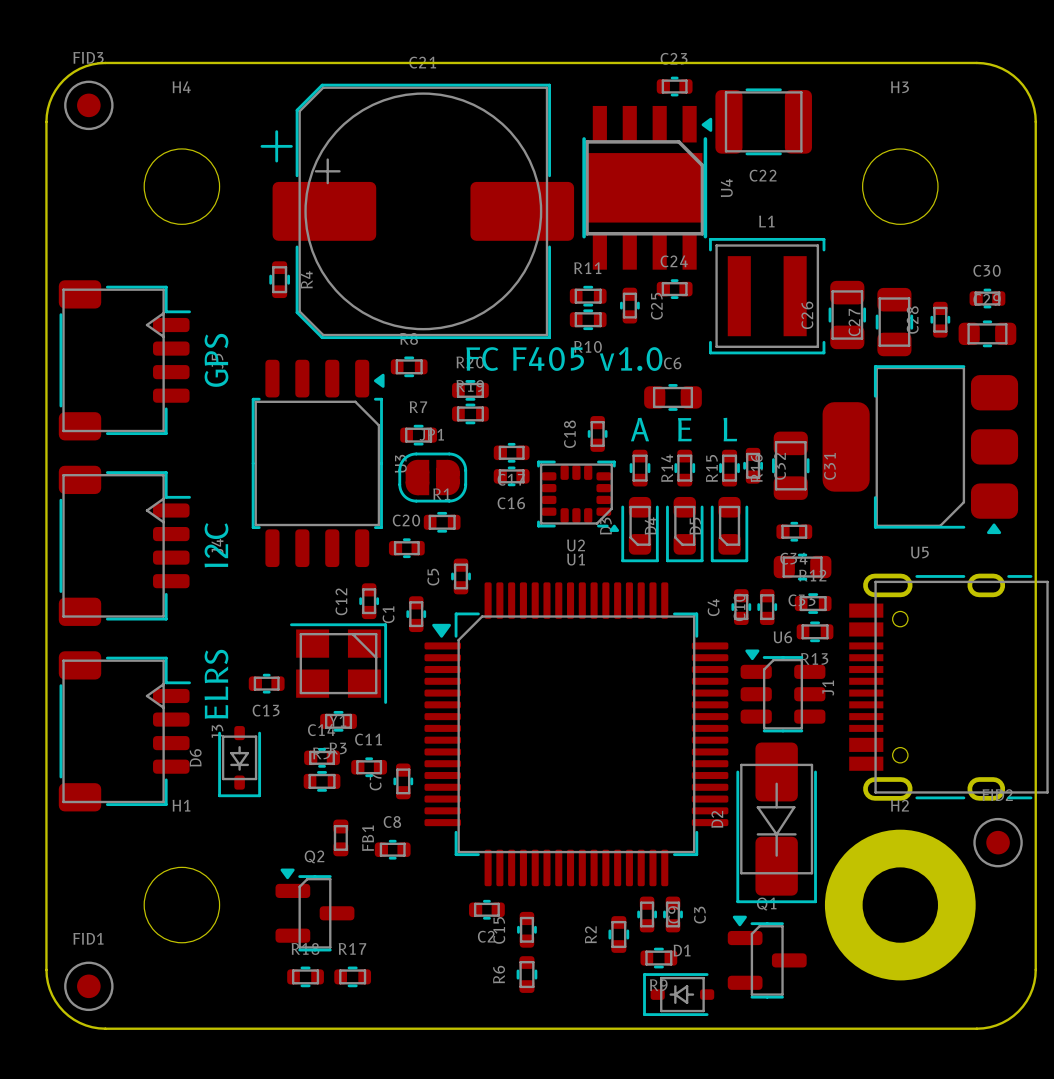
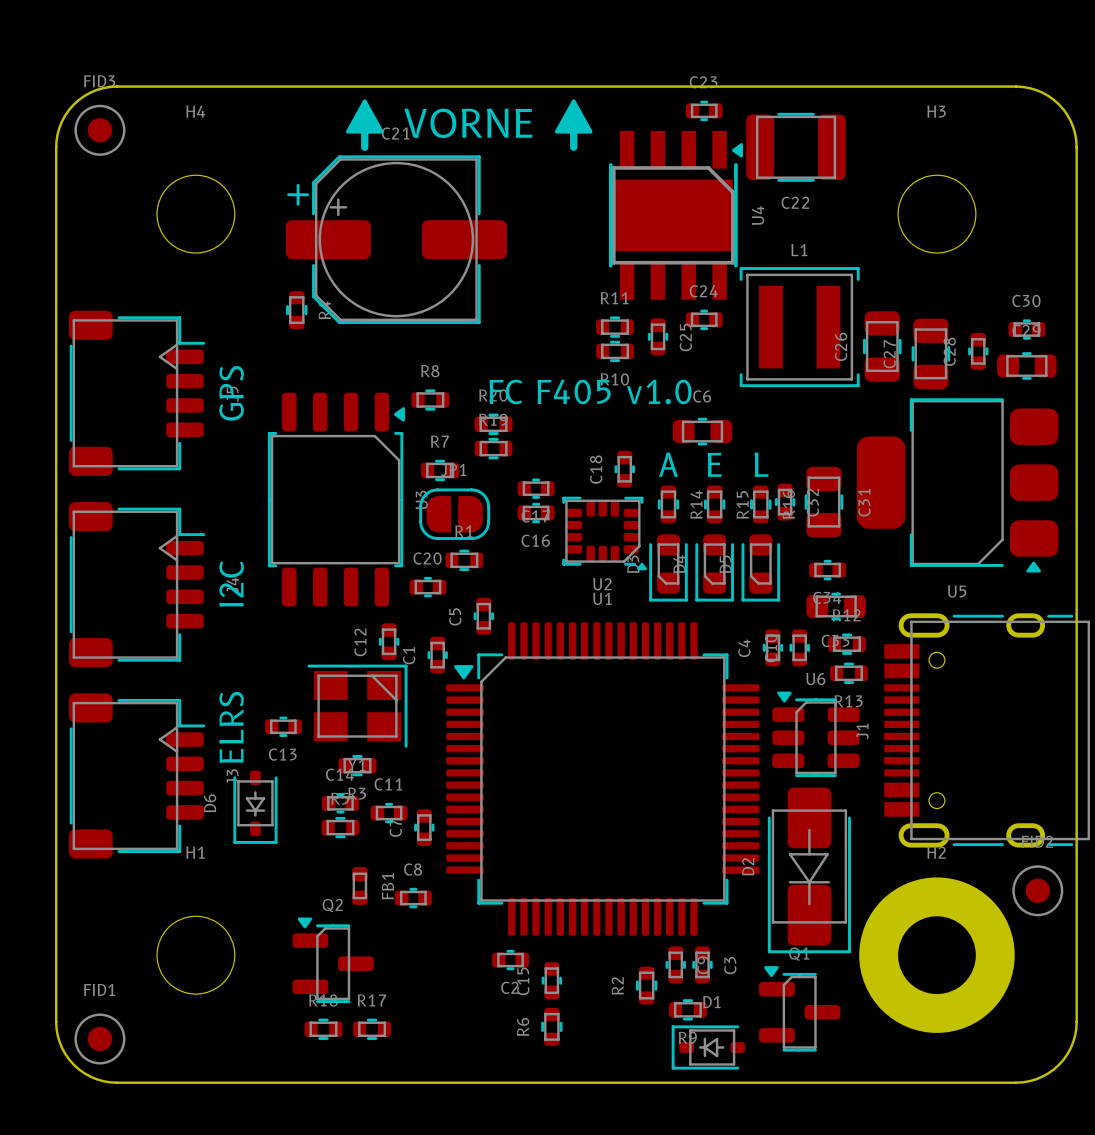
drawing: none -> [345, 99, 384, 134]
drawing: none -> [554, 99, 593, 134]
C21 footprint: [260, 83, 575, 340] -> [285, 155, 507, 324]
text: none -> VORNE (468, 123)
line: none -> (364, 129) (364, 147)
line: none -> (573, 129) (573, 147)

